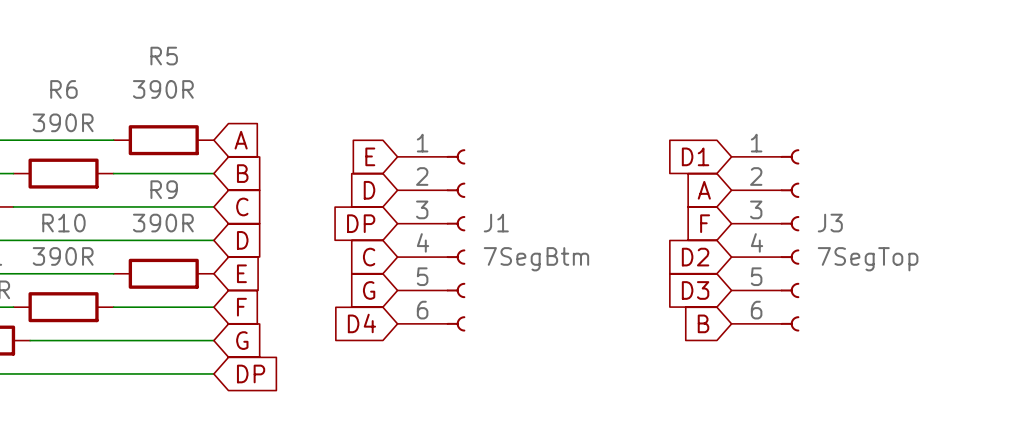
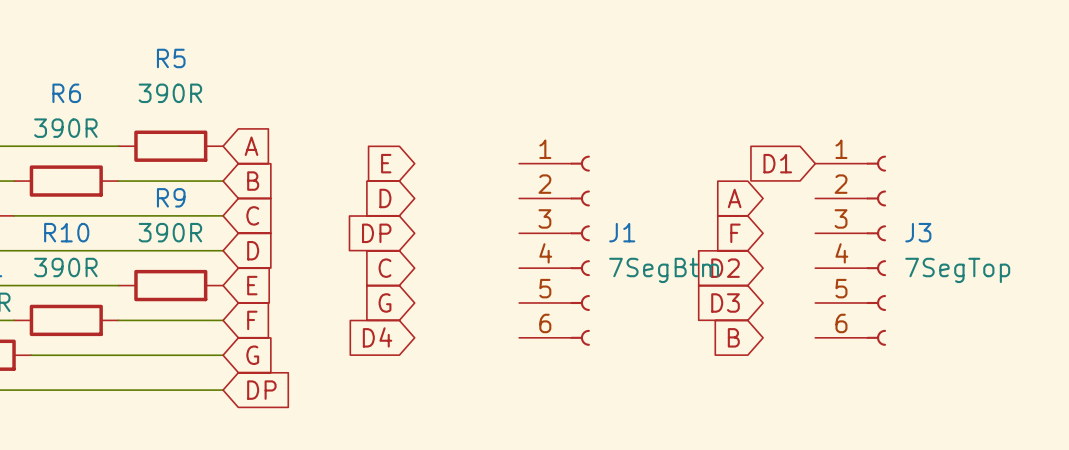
global label position: D1 (695, 156) -> D1 (777, 163)
J1 position: (431, 240) -> (554, 250)
J3 position: (765, 240) -> (850, 250)

